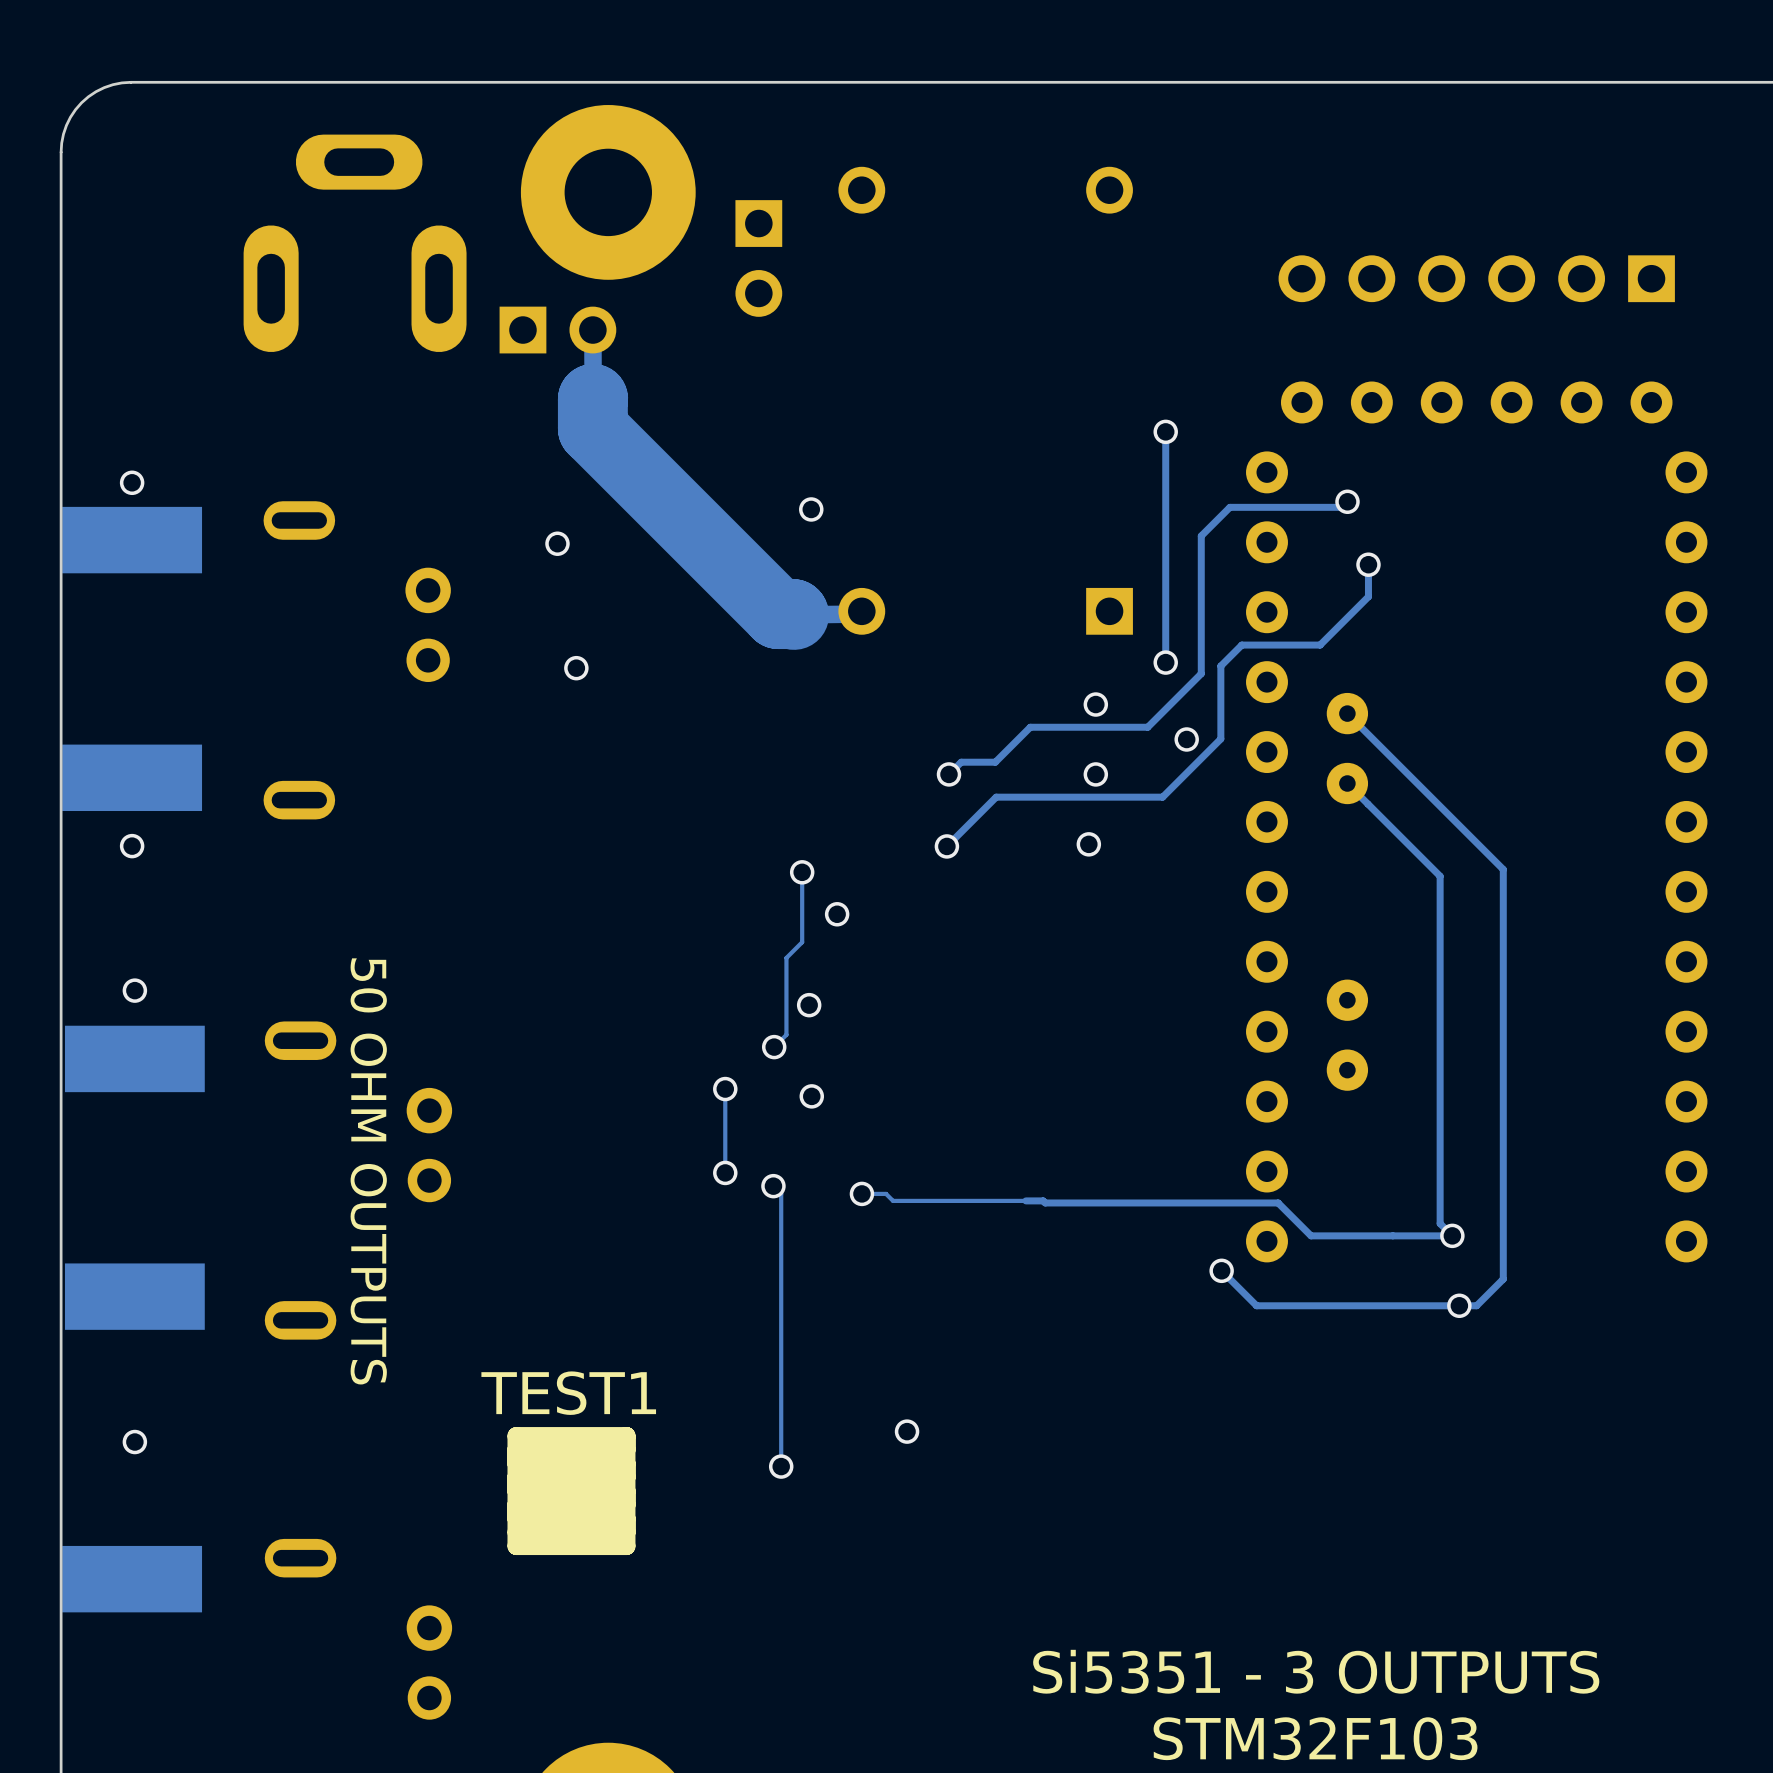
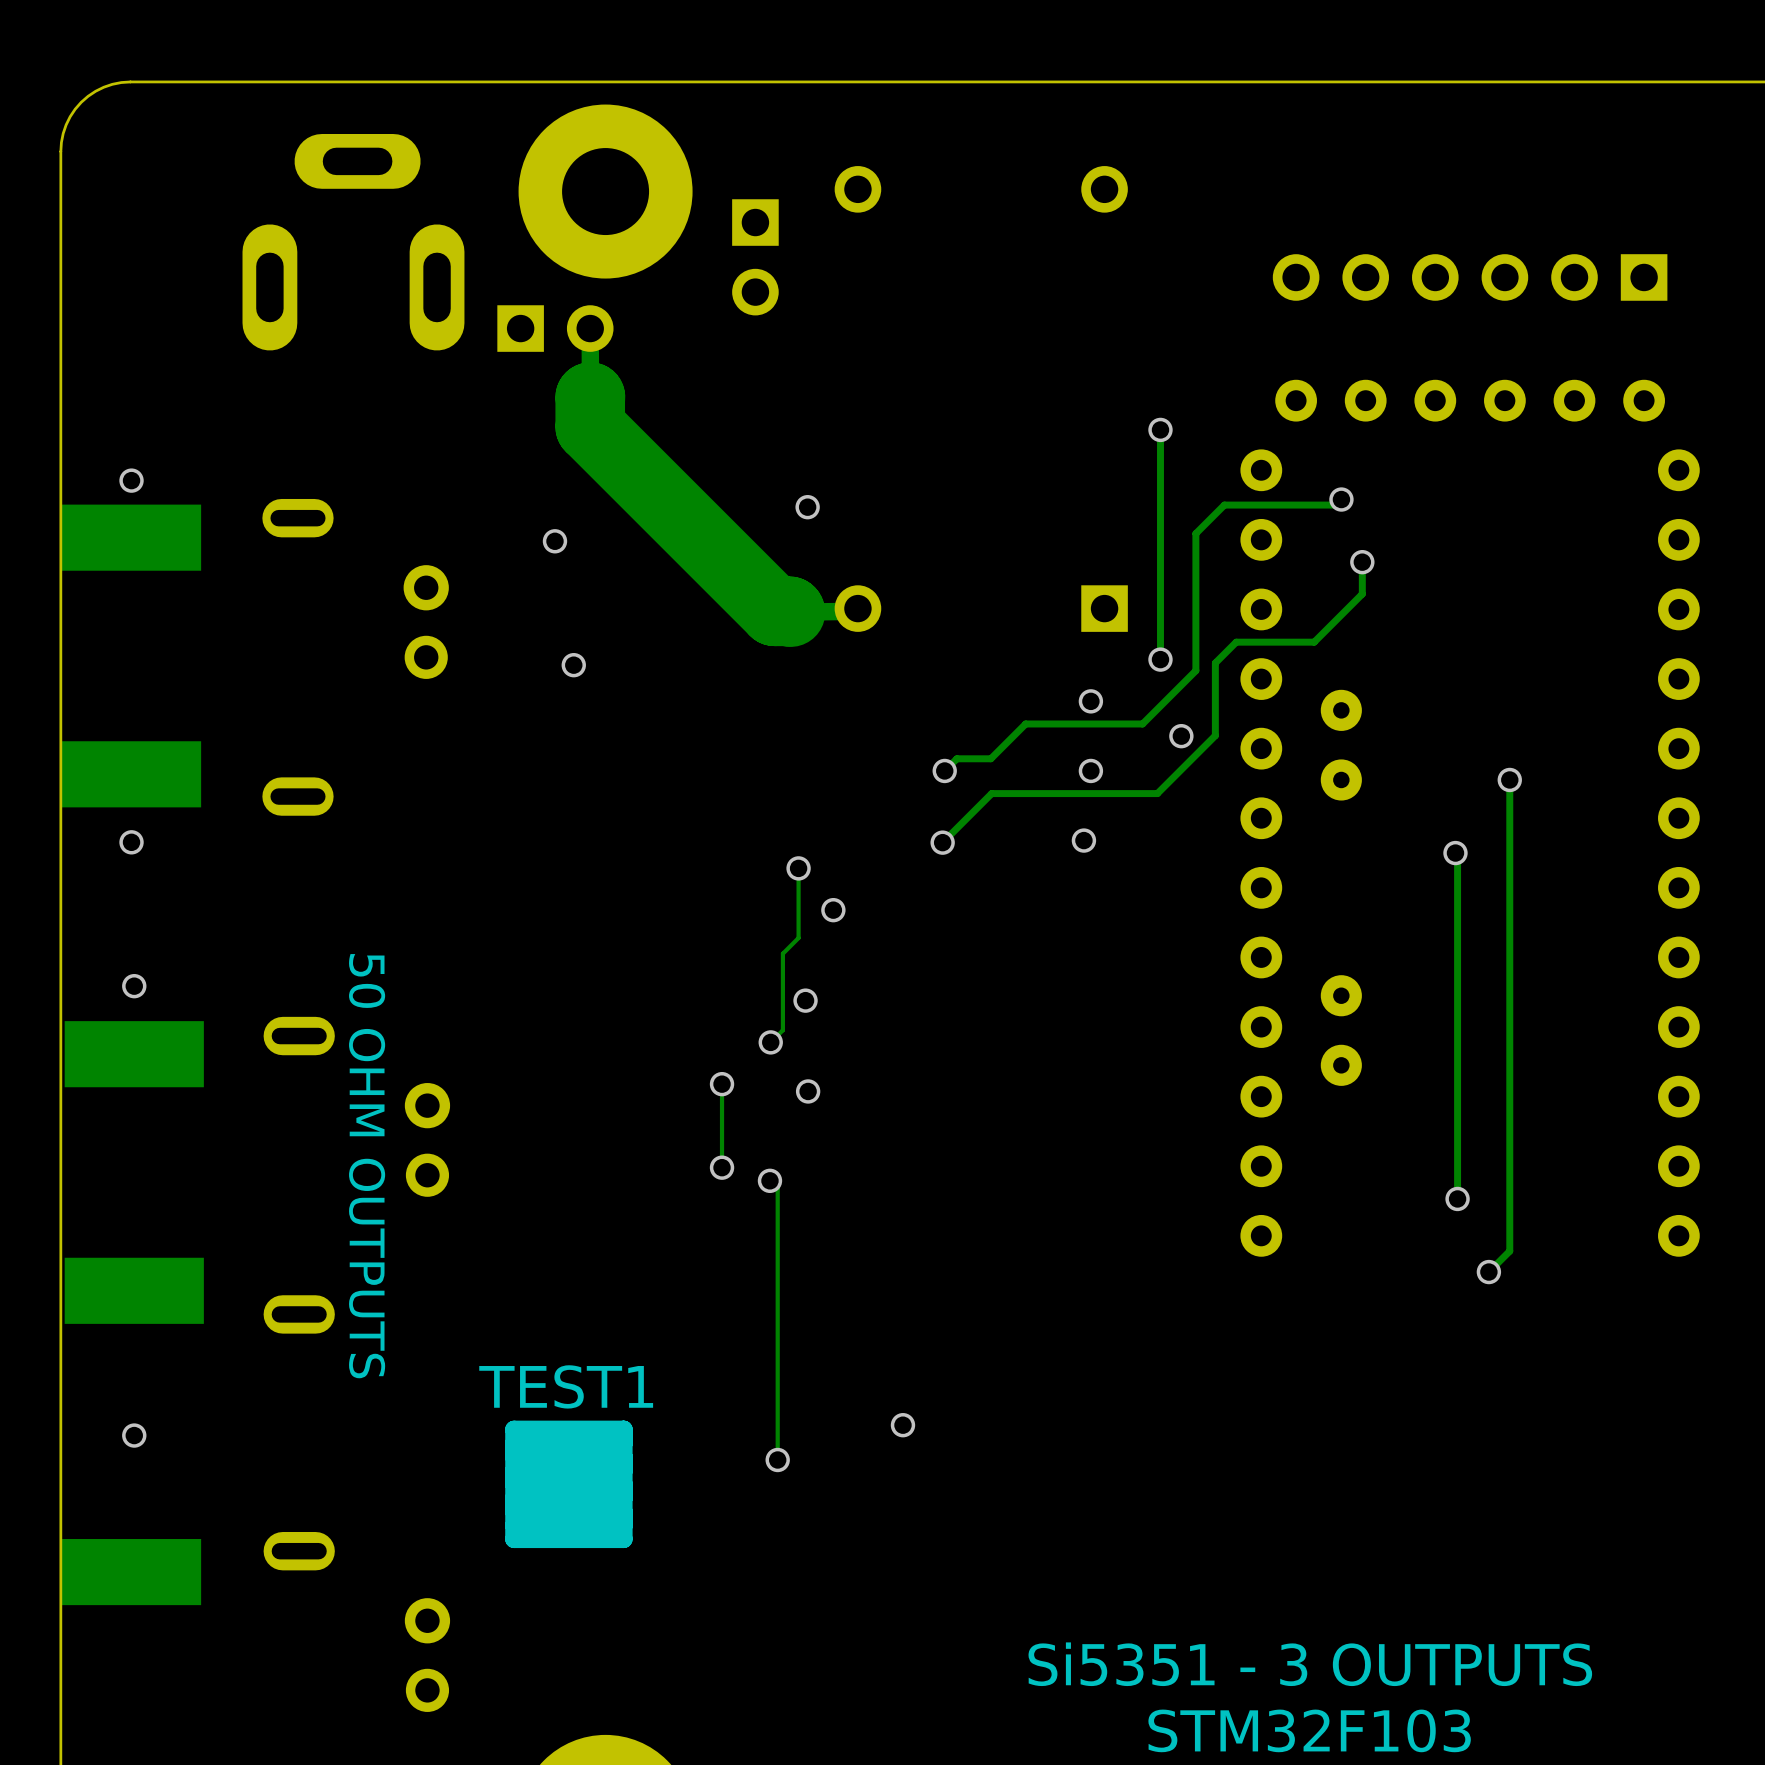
track: (1347, 713) (1503, 869) (1503, 1279) (1476, 1305) (1256, 1305) (1221, 1270) -> none
track: (1347, 783) (1440, 876) (1440, 1223) (1452, 1235) (1311, 1235) (1278, 1202) (893, 1200) (886, 1193) (861, 1193) -> none
track: none -> (1509, 779) (1509, 1251) (1488, 1272)
via: none -> (1509, 779)
track: none -> (1455, 853) (1457, 855) (1457, 1198)
via: none -> (1455, 853)
via: (861, 1193) -> none
via: none -> (1457, 1198)
via: (1452, 1235) -> none
via: (1221, 1270) -> none
via: none -> (1488, 1272)
via: (1459, 1305) -> none

